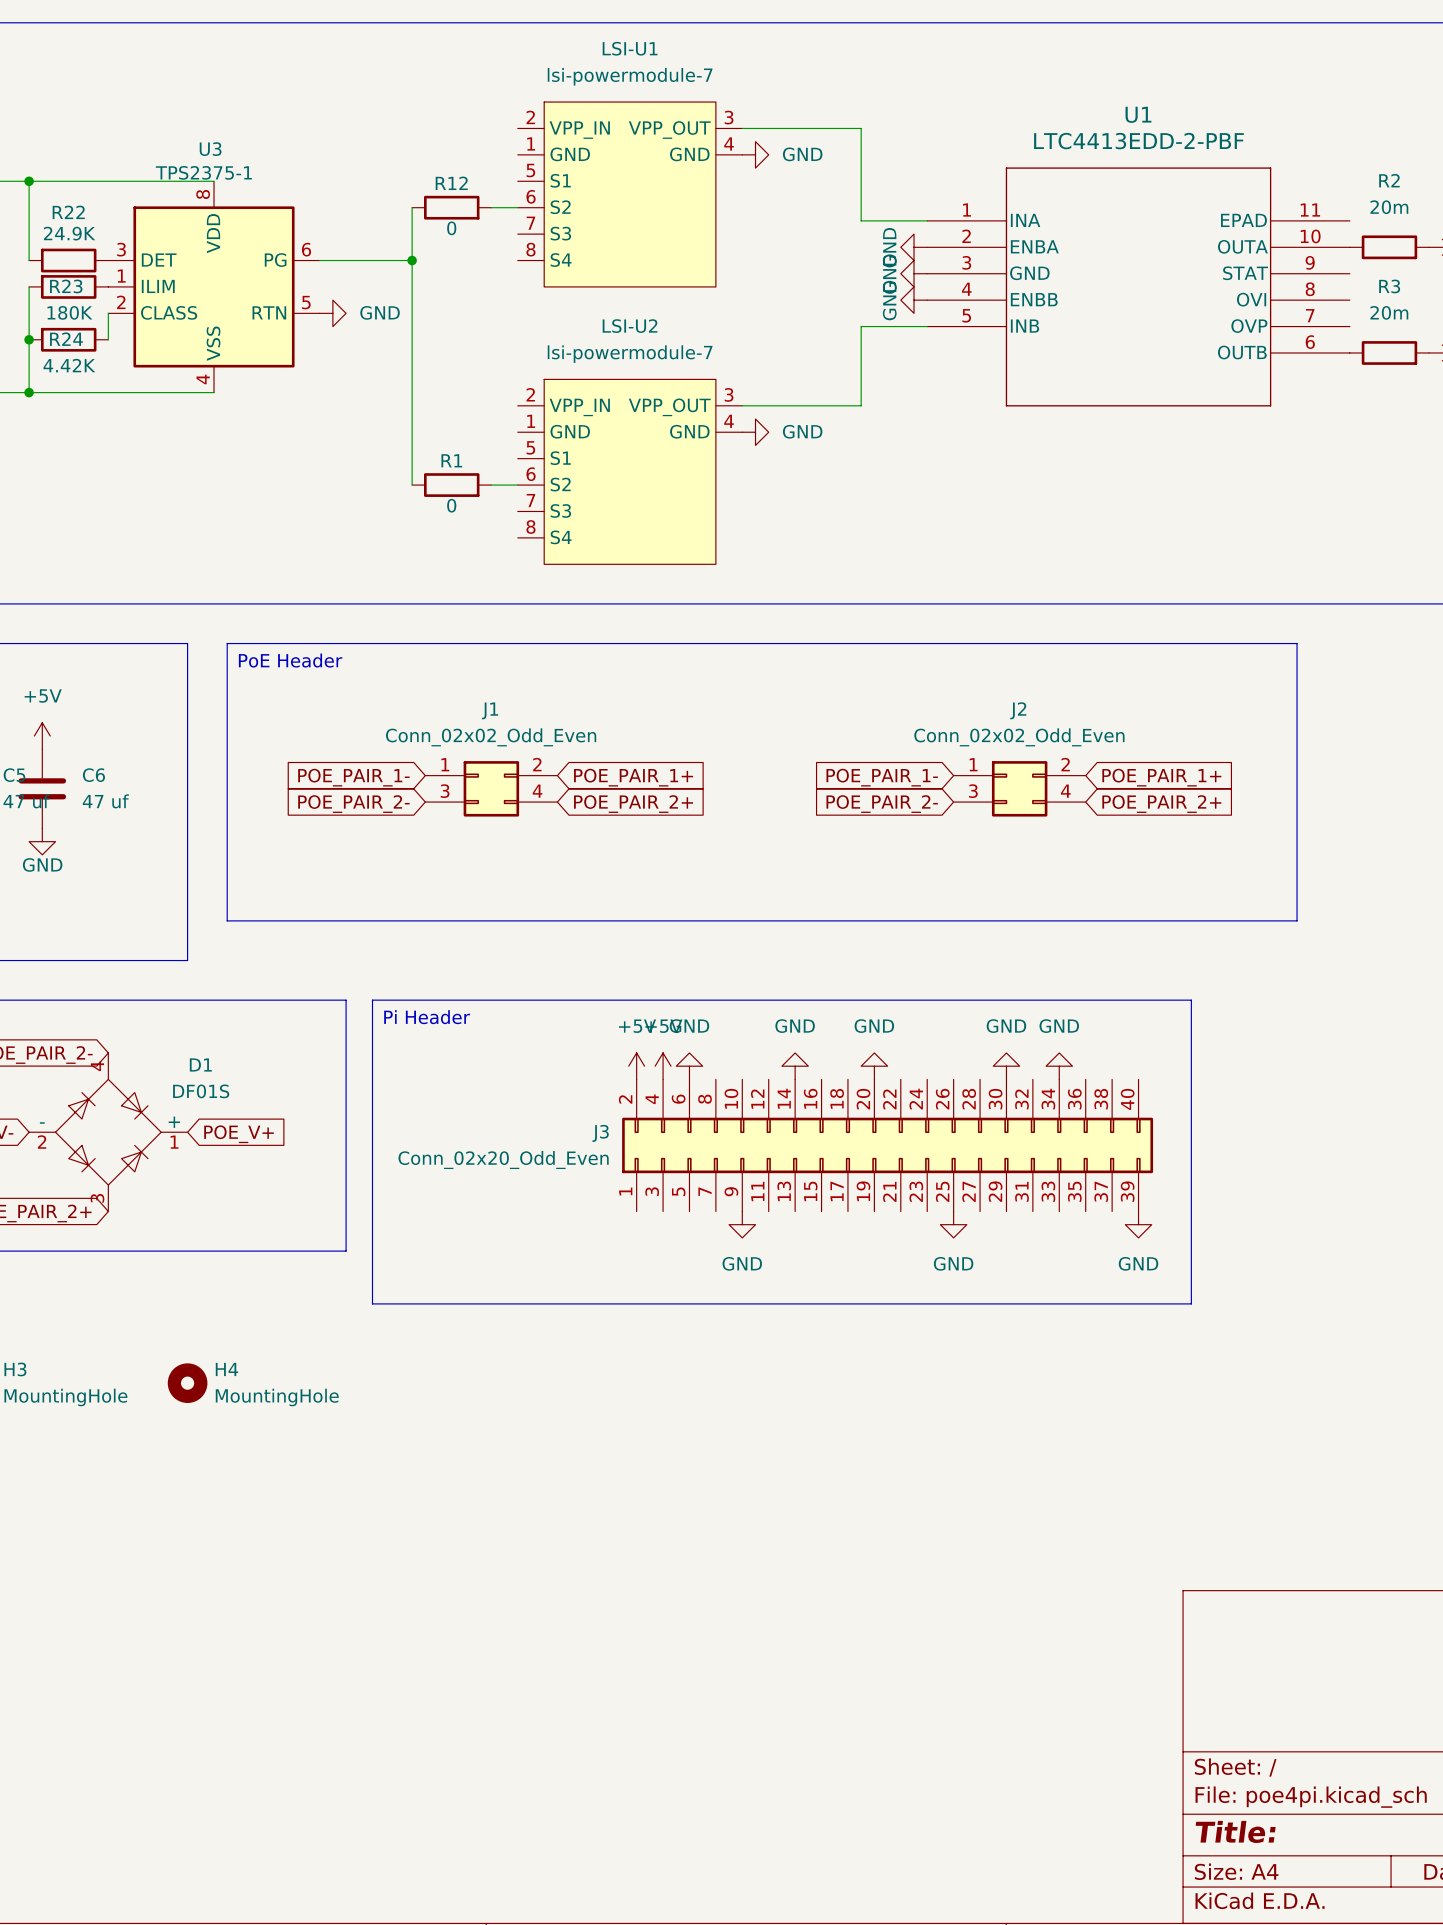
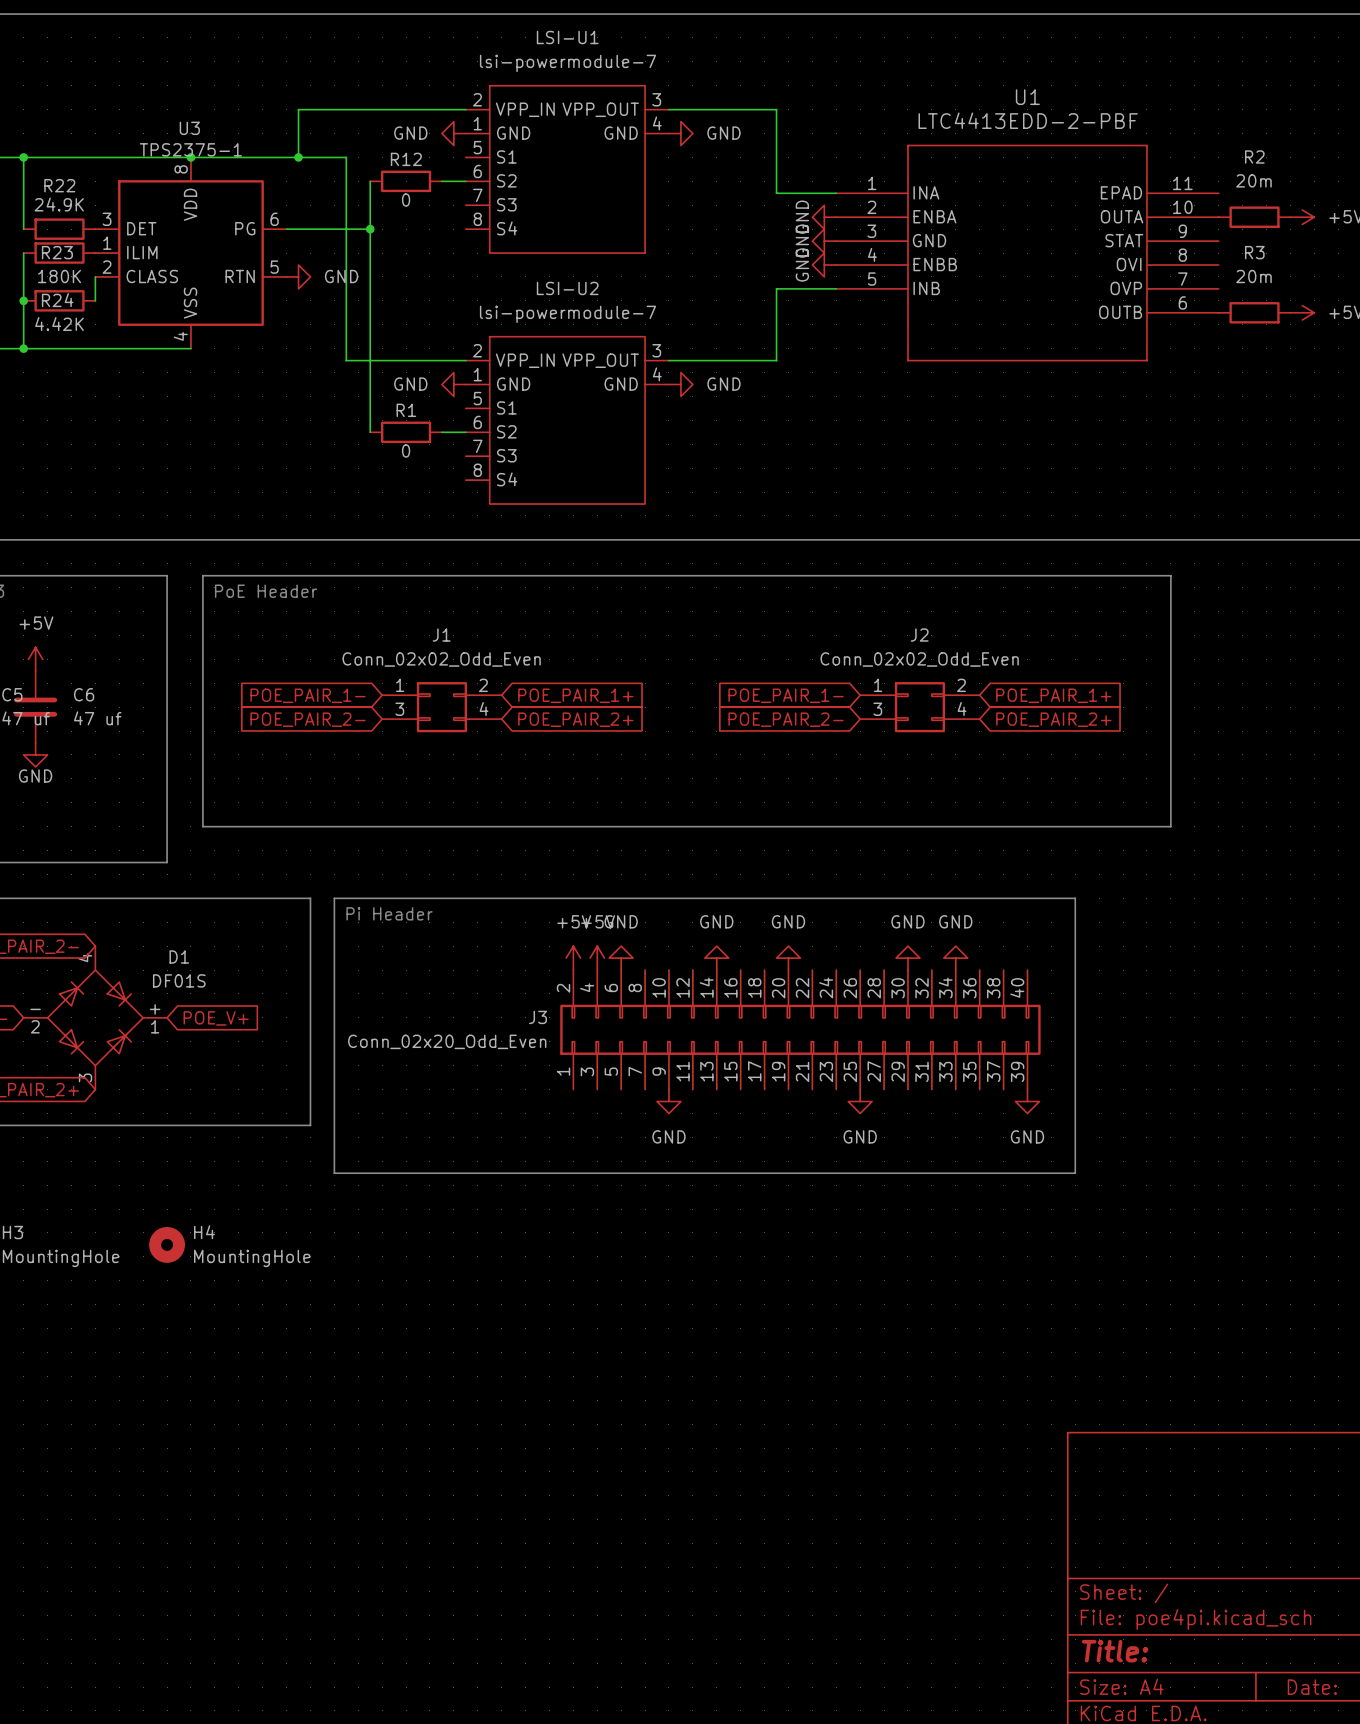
wire: none -> (465, 109) (298, 109) (298, 157)
power symbol: none -> GND (453, 133)
wire: none -> (190, 157) (346, 157) (346, 360) (465, 360)
junction: none -> (190, 157)
junction: none -> (298, 157)
power symbol: none -> GND (453, 384)

